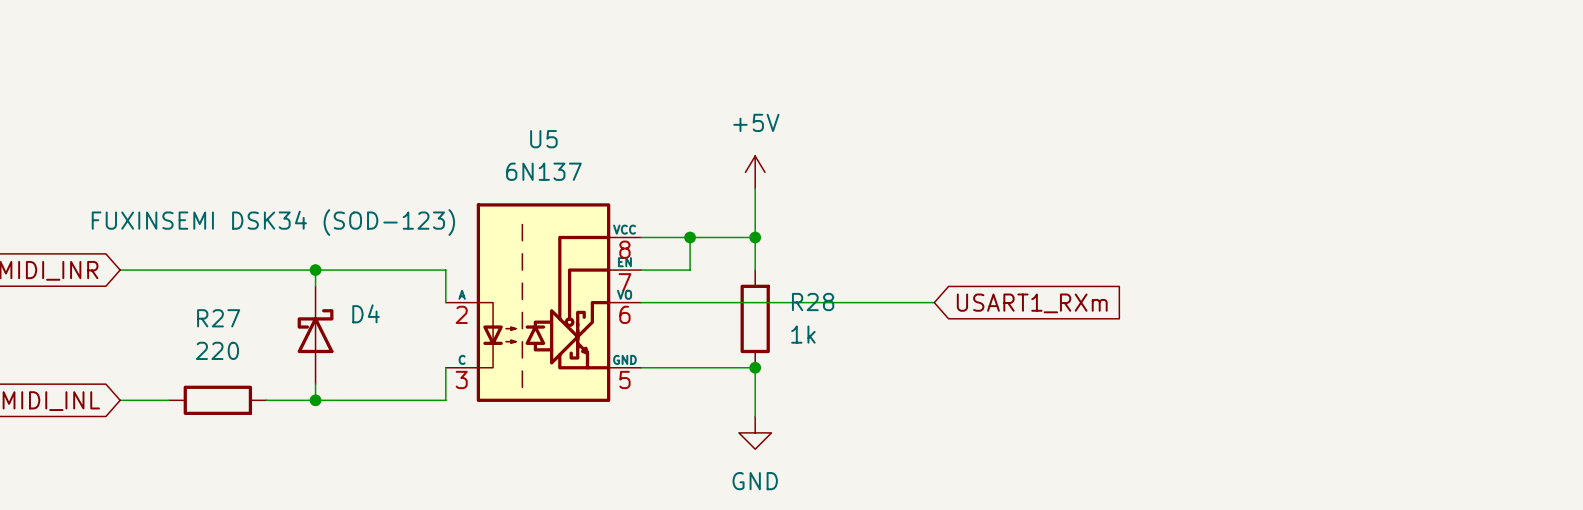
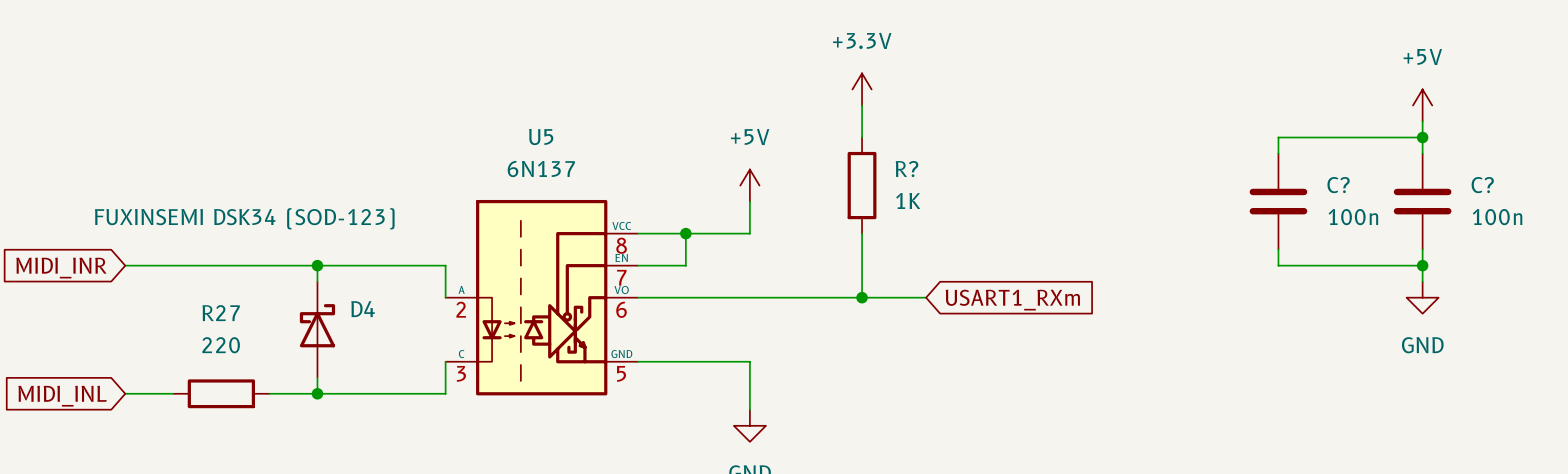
power symbol: none -> +3.3V (862, 89)
power symbol: none -> +5V (1422, 105)
wire: none -> (1422, 121) (1422, 153)
wire: none -> (1422, 137) (1278, 137) (1278, 153)
junction: none -> (1422, 137)
power symbol position: +5V (755, 172) -> +5V (749, 185)
R?: none -> 1K (862, 185)
C?: none -> 100n (1278, 201)
C?: none -> 100n (1422, 201)
wire: (755, 237) (755, 270) -> (862, 105) (862, 137)
junction: (755, 237) -> none
wire: none -> (862, 233) (862, 297)
wire: none -> (1278, 249) (1278, 265) (1422, 265)
wire: none -> (1422, 249) (1422, 281)
junction: none -> (1422, 265)
junction: none -> (862, 297)
power symbol: none -> GND (1422, 297)
R28: 1k (755, 318) -> none
junction: (755, 367) -> none

